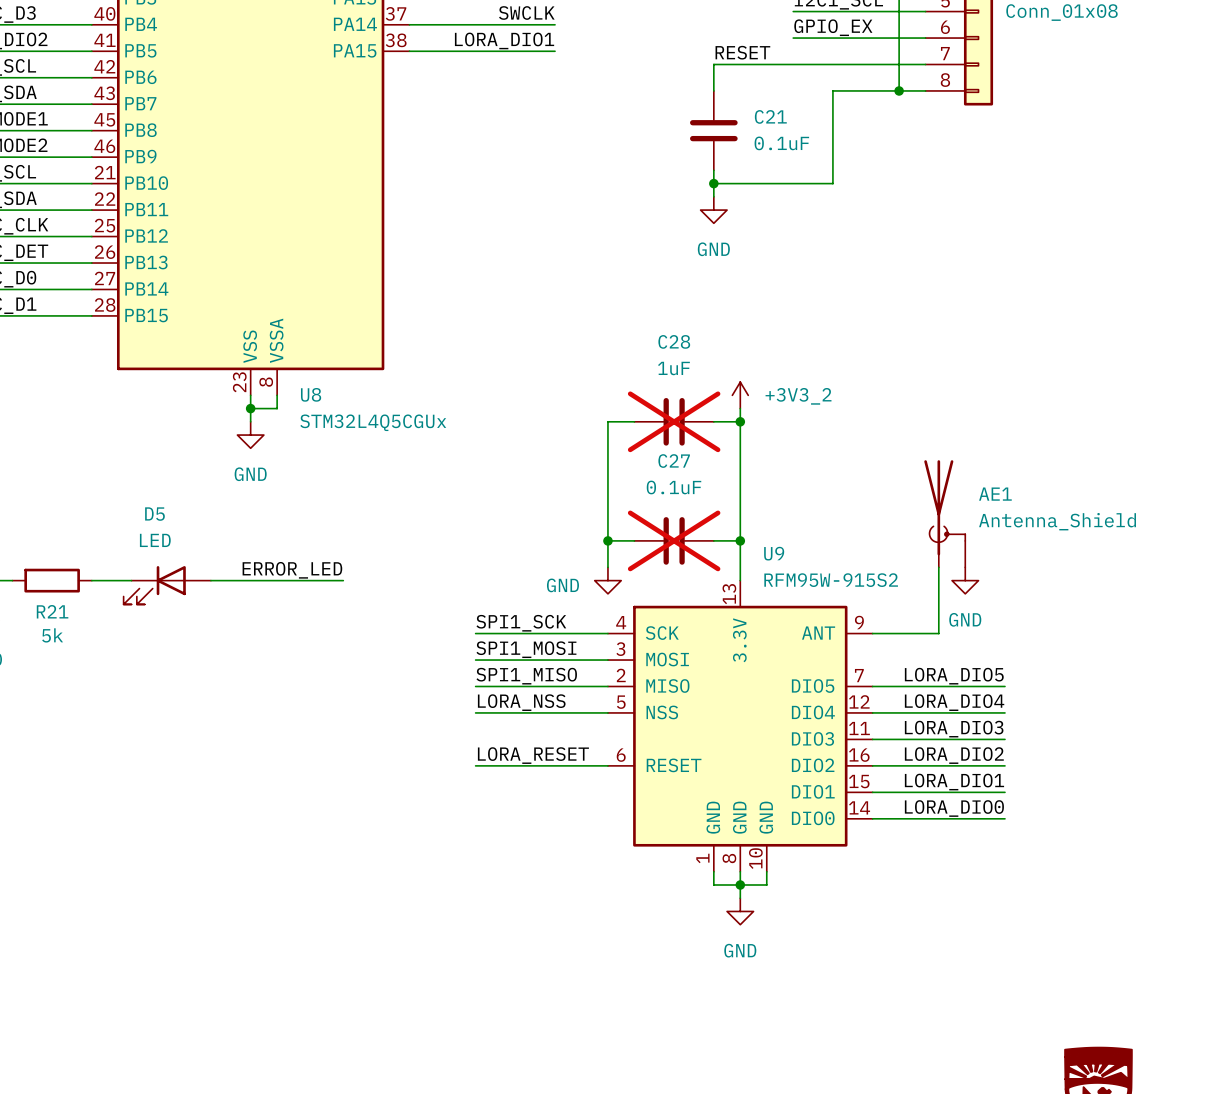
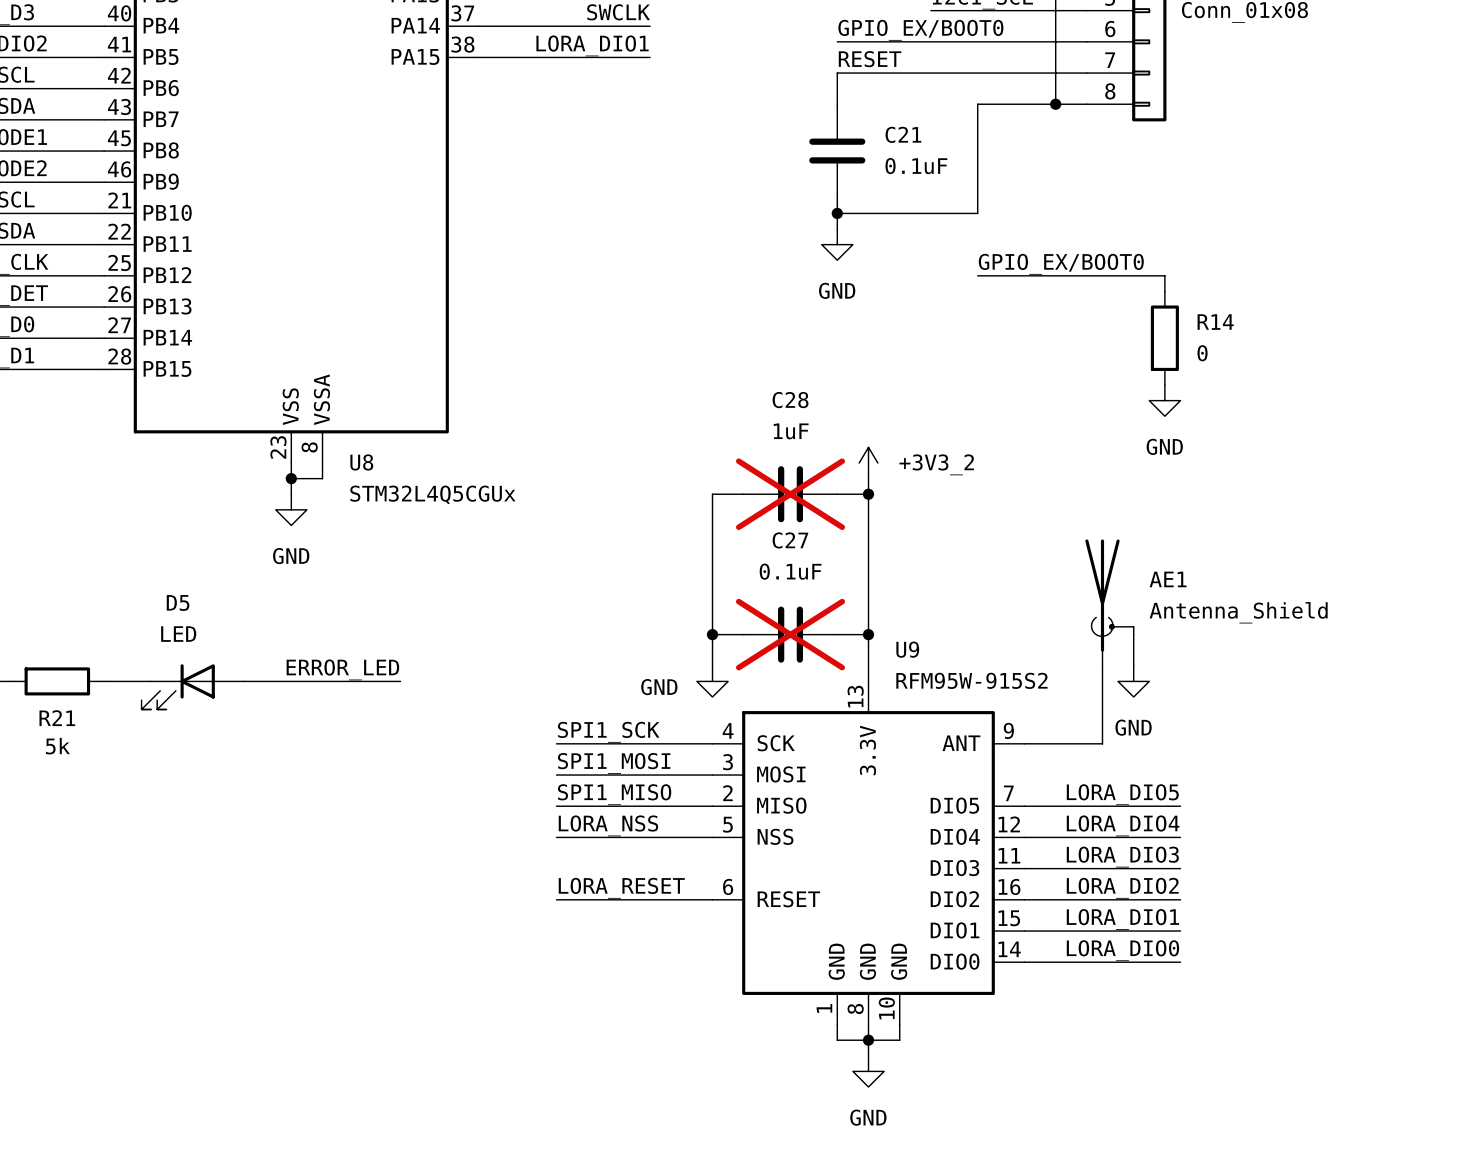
label: GPIO_EX (833, 27) -> GPIO_EX/BOOT0 (920, 30)
wire: none -> (837, 41) (930, 41)
label: none -> GPIO_EX/BOOT0 (1061, 264)
wire: none -> (977, 275) (1164, 275) (1164, 291)
R14: none -> 0 (1164, 338)
power symbol: none -> GND (1164, 400)

